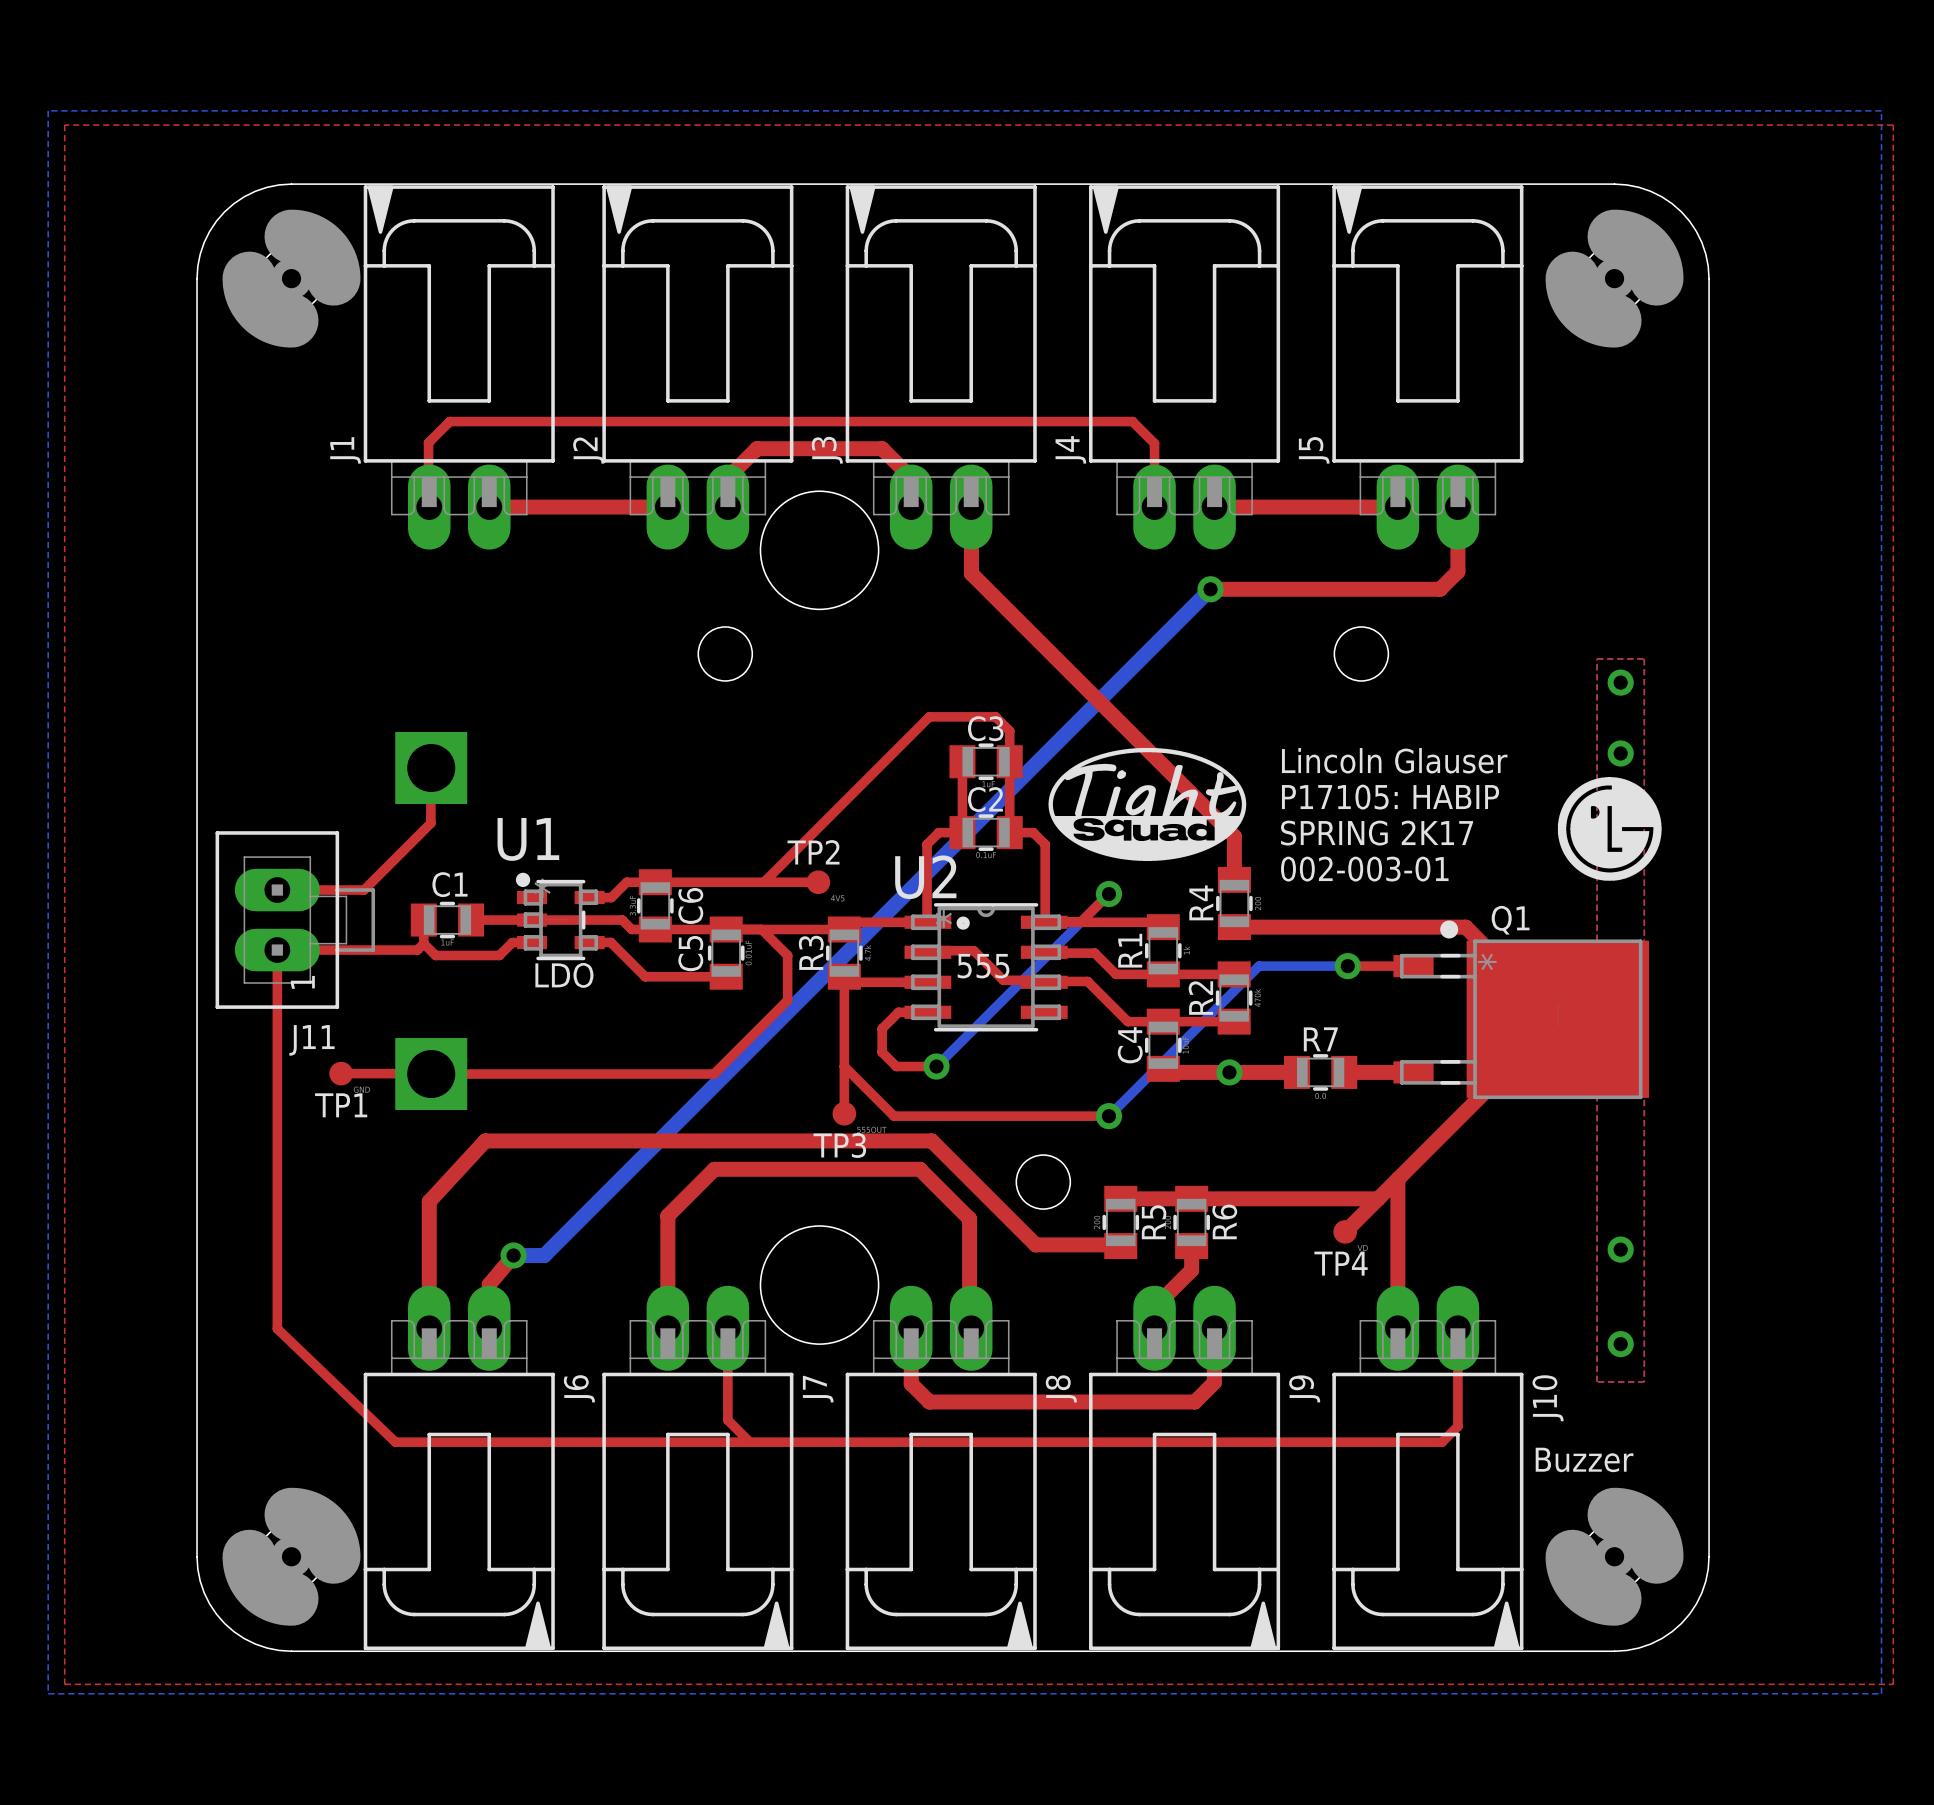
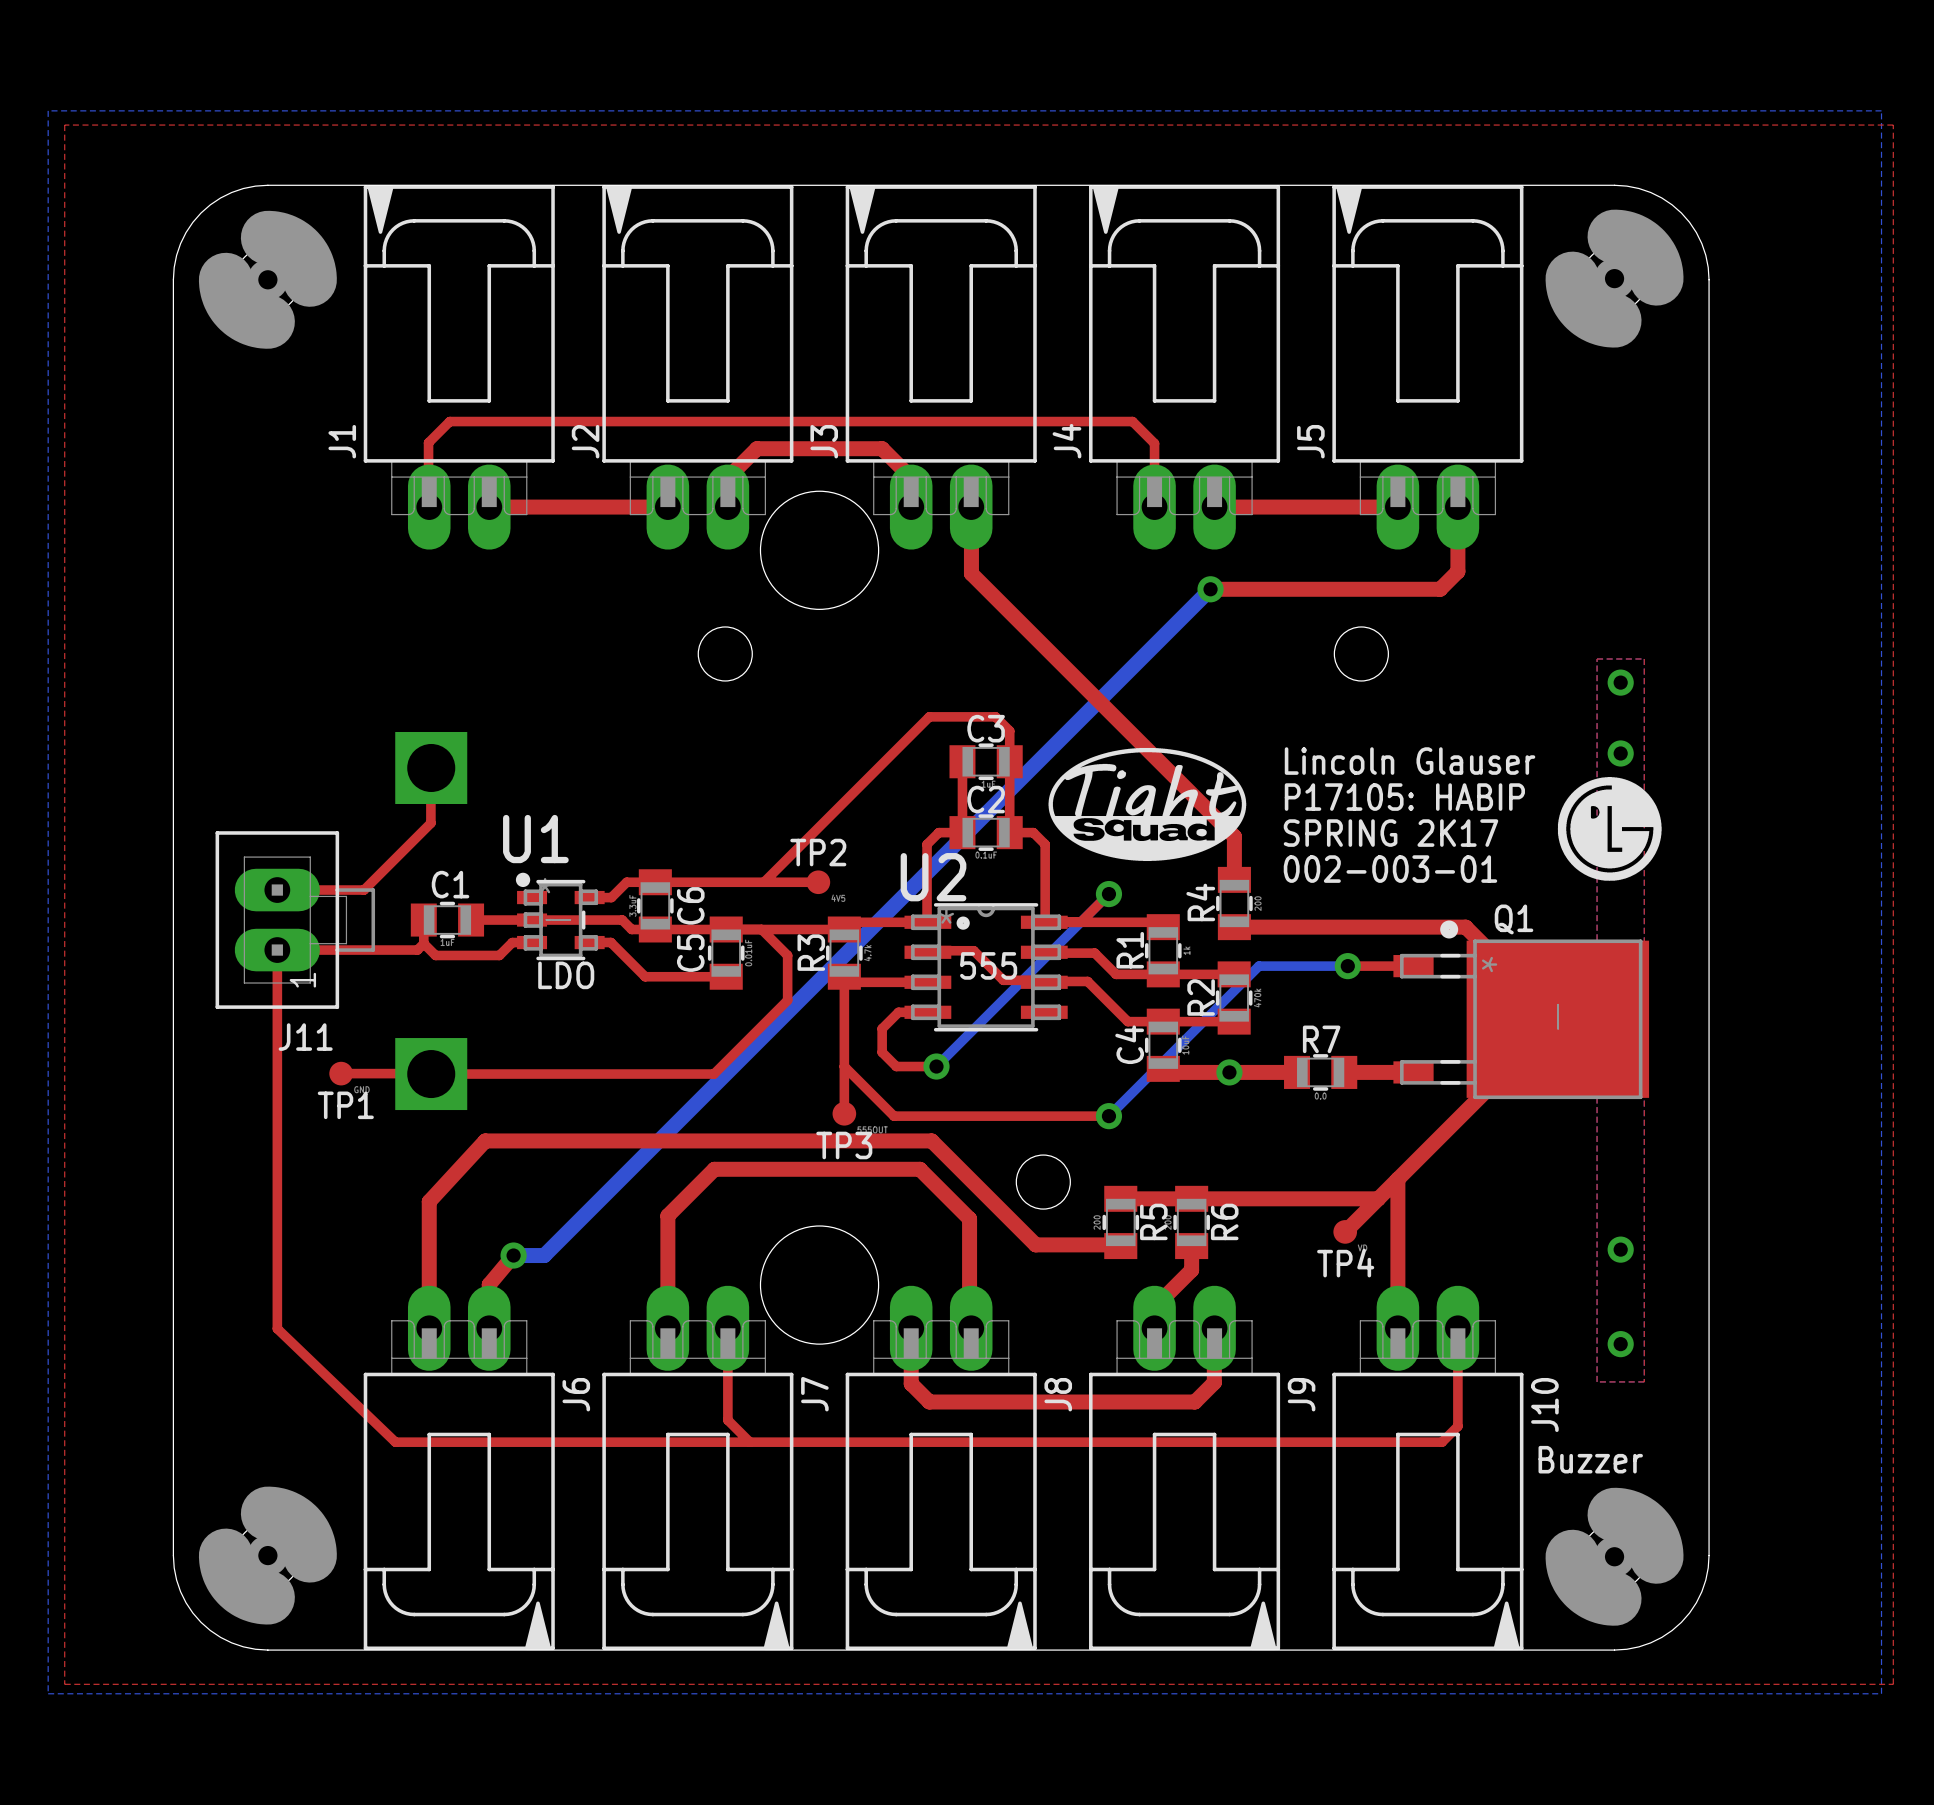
part position: (291, 278) -> (267, 279)
board edge: (1709, 279) (1708, 266) (1701, 242) (1696, 231) (1681, 211) (1661, 196) (1650, 191) (1626, 184) (1614, 184) (279, 184) (267, 187) (244, 196) (224, 211) (209, 231) (204, 242) (197, 266) (197, 278) (197, 1556) (200, 1581) (209, 1604) (224, 1623) (233, 1631) (244, 1638) (267, 1648) (291, 1651) (1614, 1651) (1626, 1650) (1650, 1644) (1661, 1638) (1681, 1623) (1696, 1604) (1701, 1592) (1708, 1569) (1709, 1555) -> (1709, 279) (1708, 267) (1701, 243) (1696, 232) (1681, 212) (1661, 197) (1650, 192) (1626, 186) (1614, 185) (255, 186) (243, 188) (220, 197) (201, 212) (186, 232) (180, 243) (174, 267) (173, 279) (173, 1555) (176, 1580) (186, 1602) (201, 1622) (210, 1630) (220, 1637) (243, 1646) (267, 1650) (1614, 1650) (1626, 1649) (1650, 1642) (1661, 1637) (1681, 1622) (1696, 1602) (1701, 1591) (1708, 1567) (1709, 1555)
part position: (291, 1556) -> (267, 1555)

